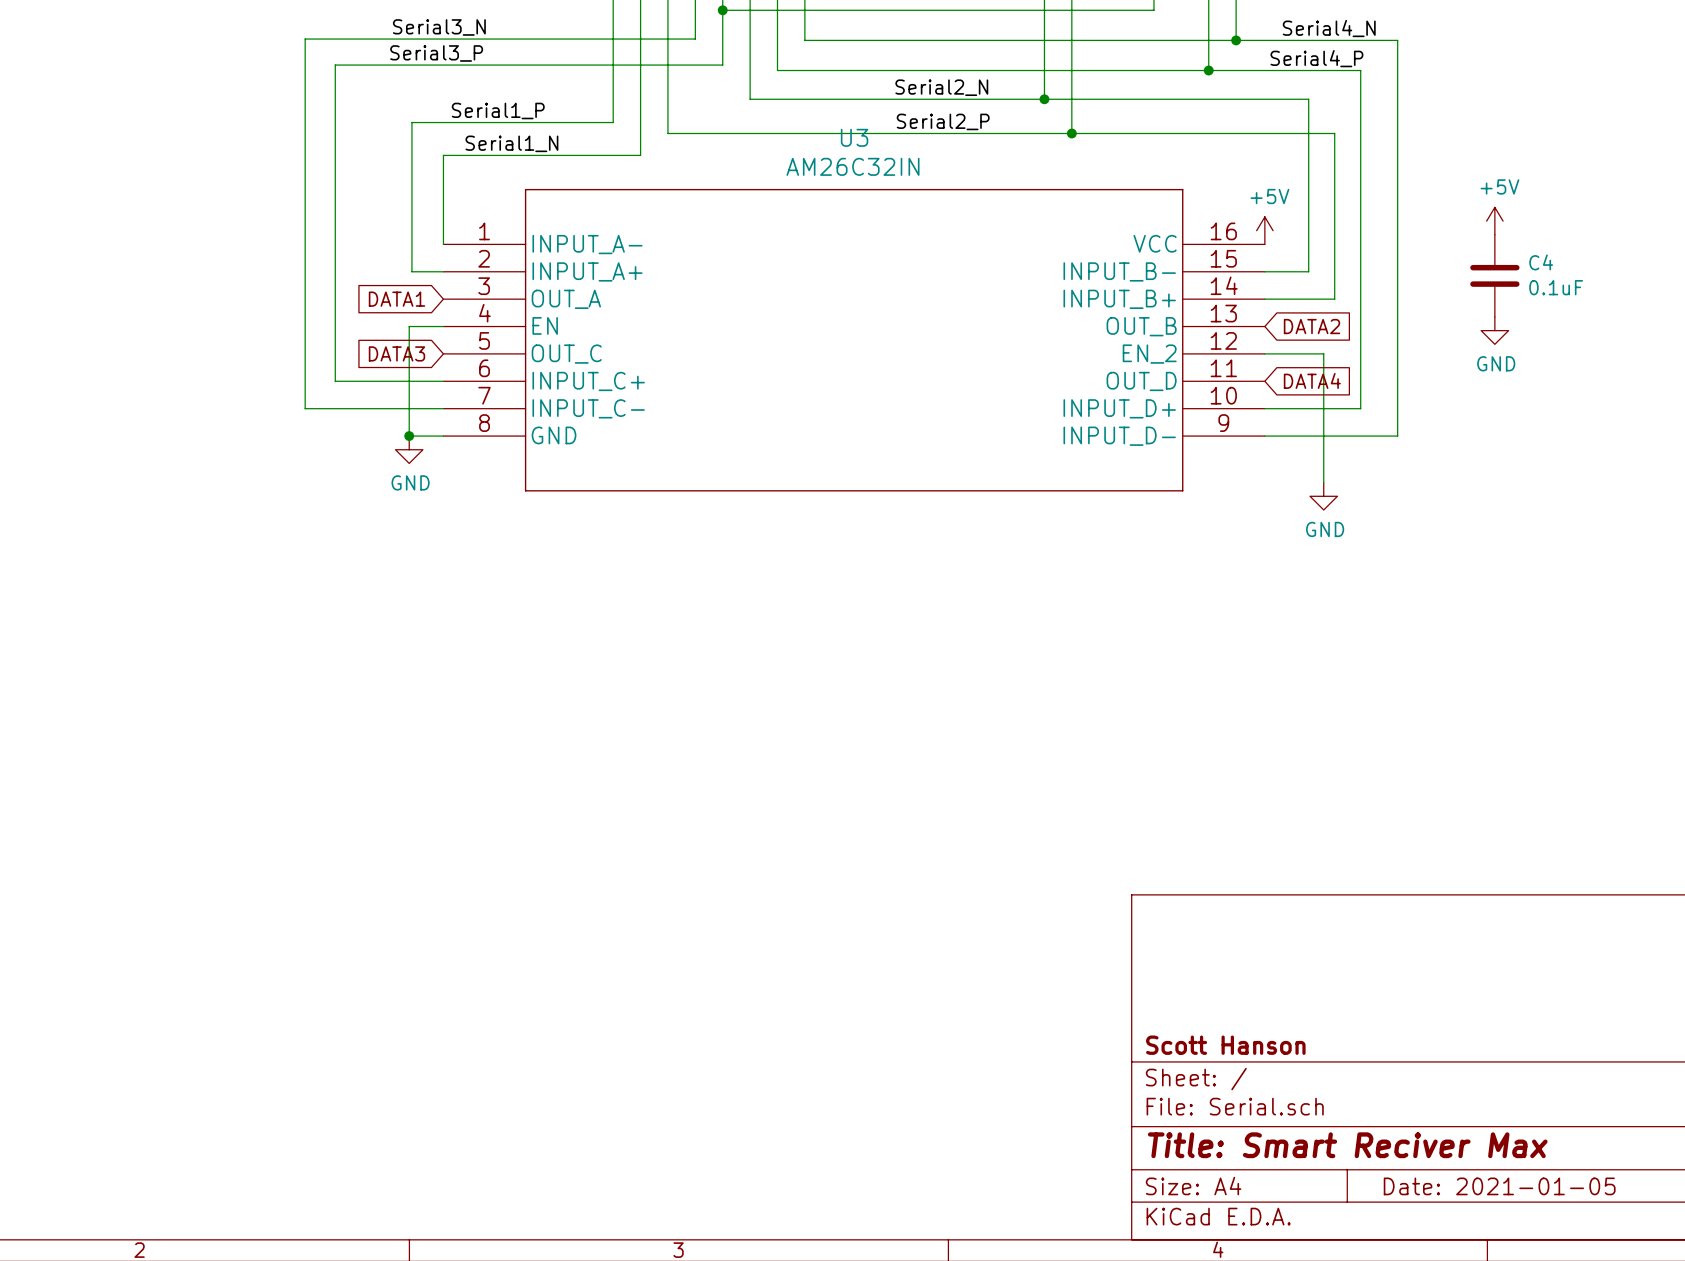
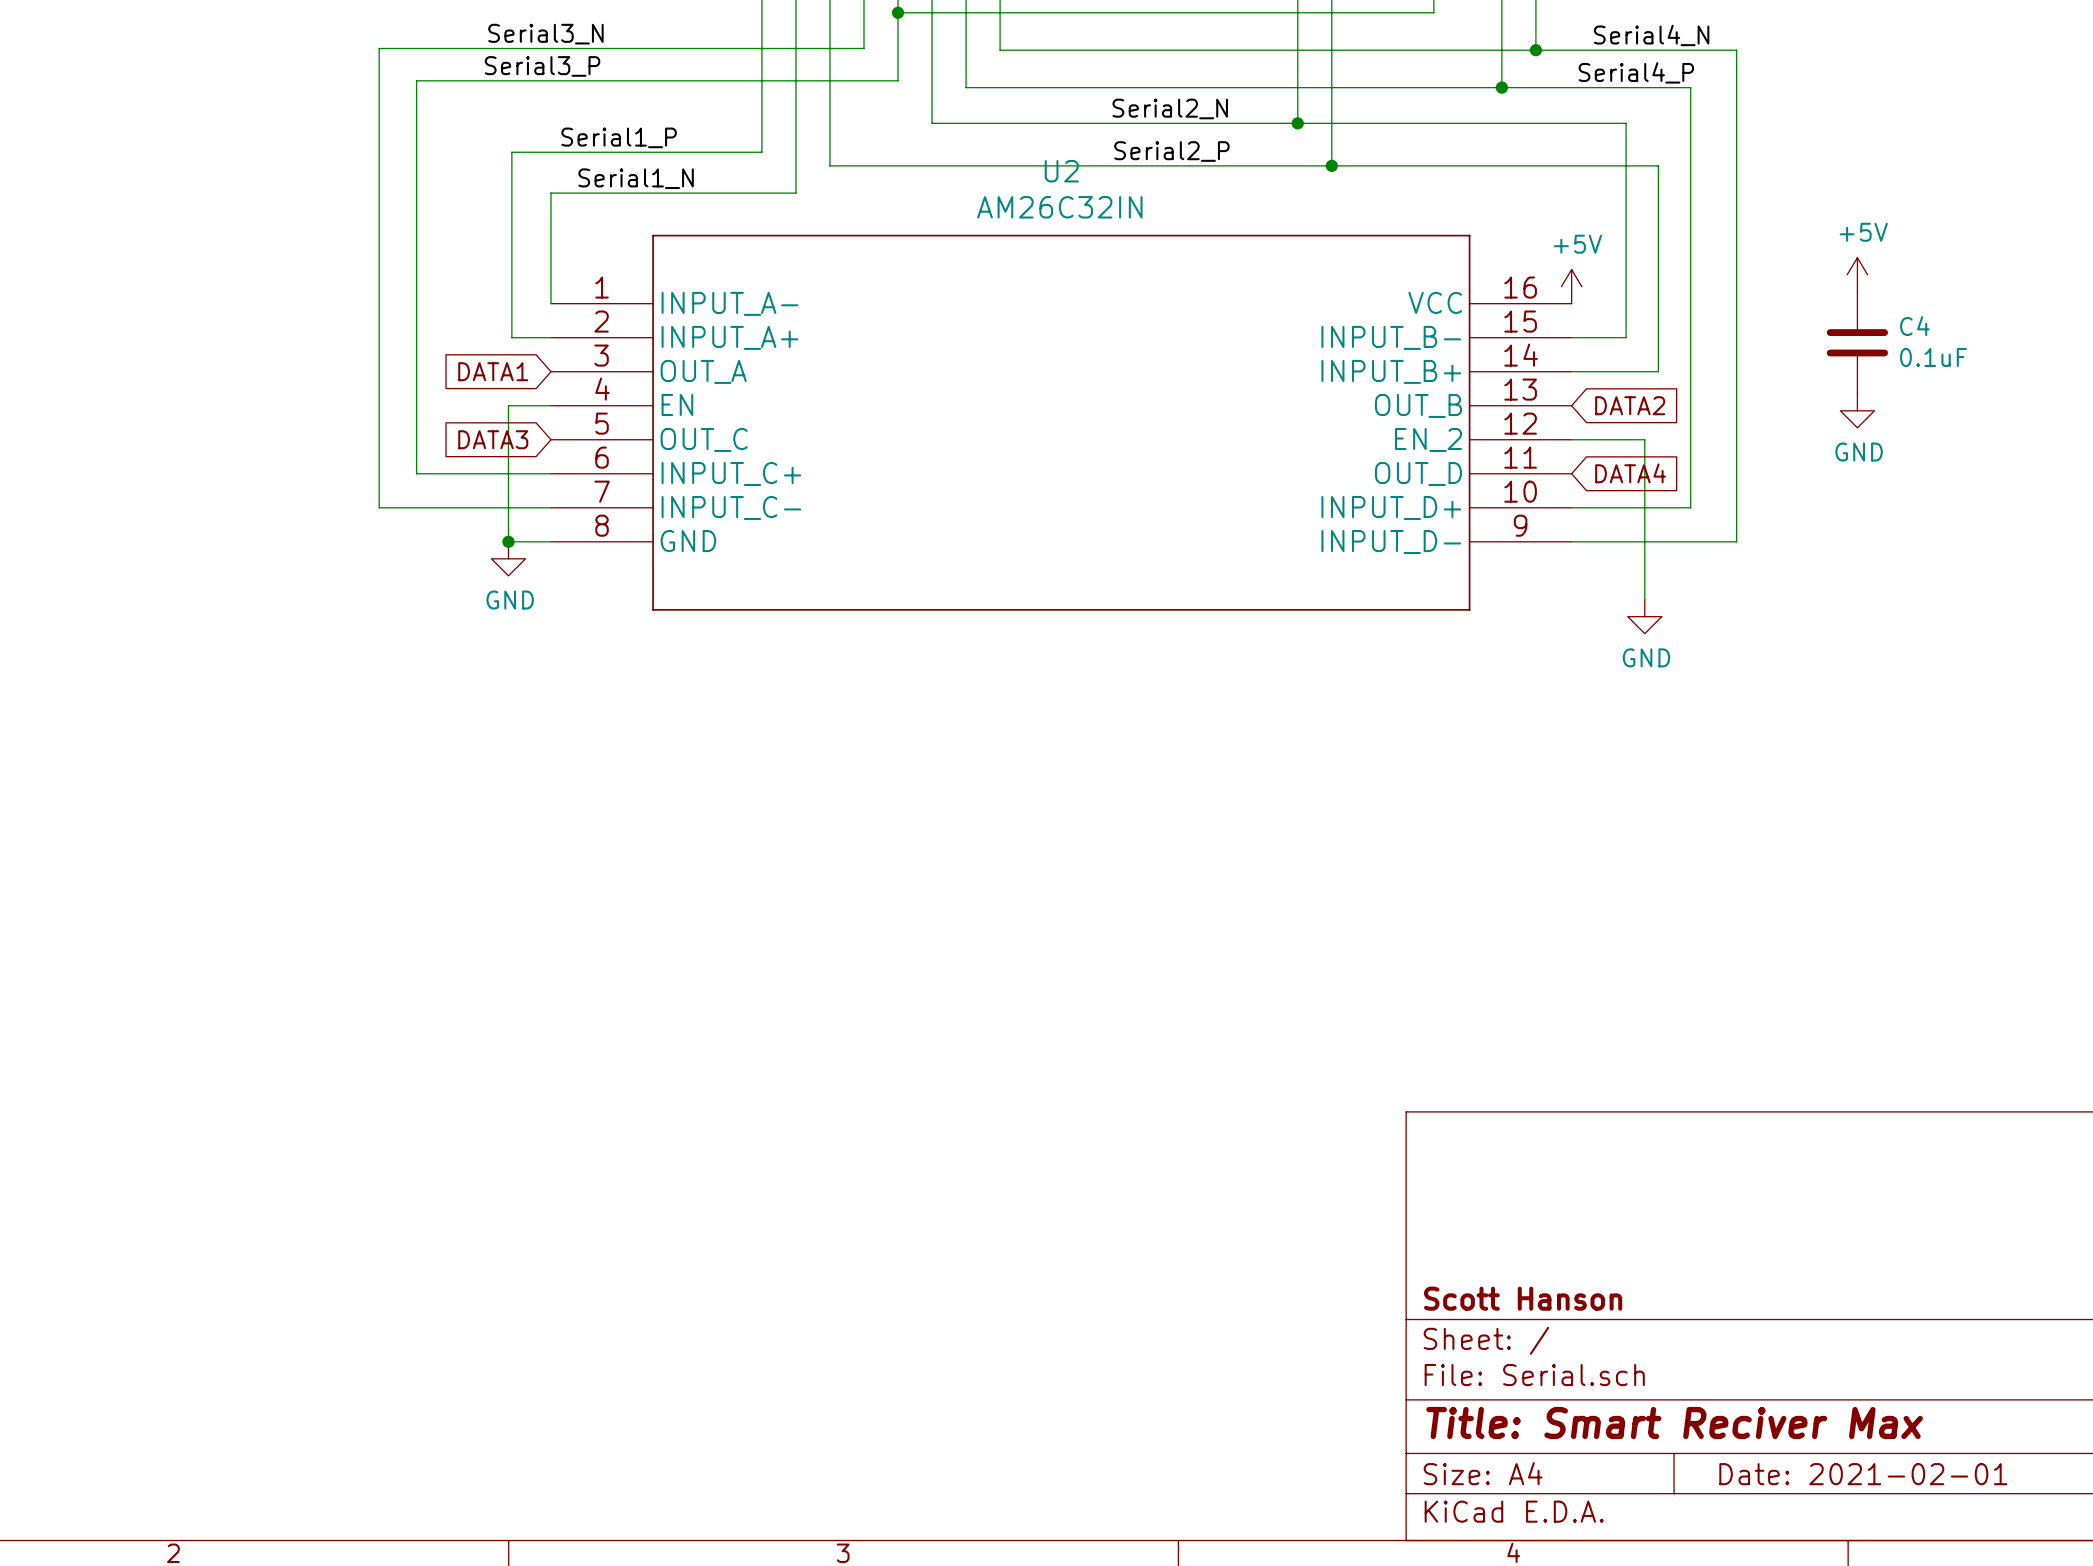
U3 name: U3 (854, 137) -> U2 (1061, 171)
title block: Date: 2021-01-05 (1499, 1186) -> Date: 2021-02-01 (1863, 1474)

